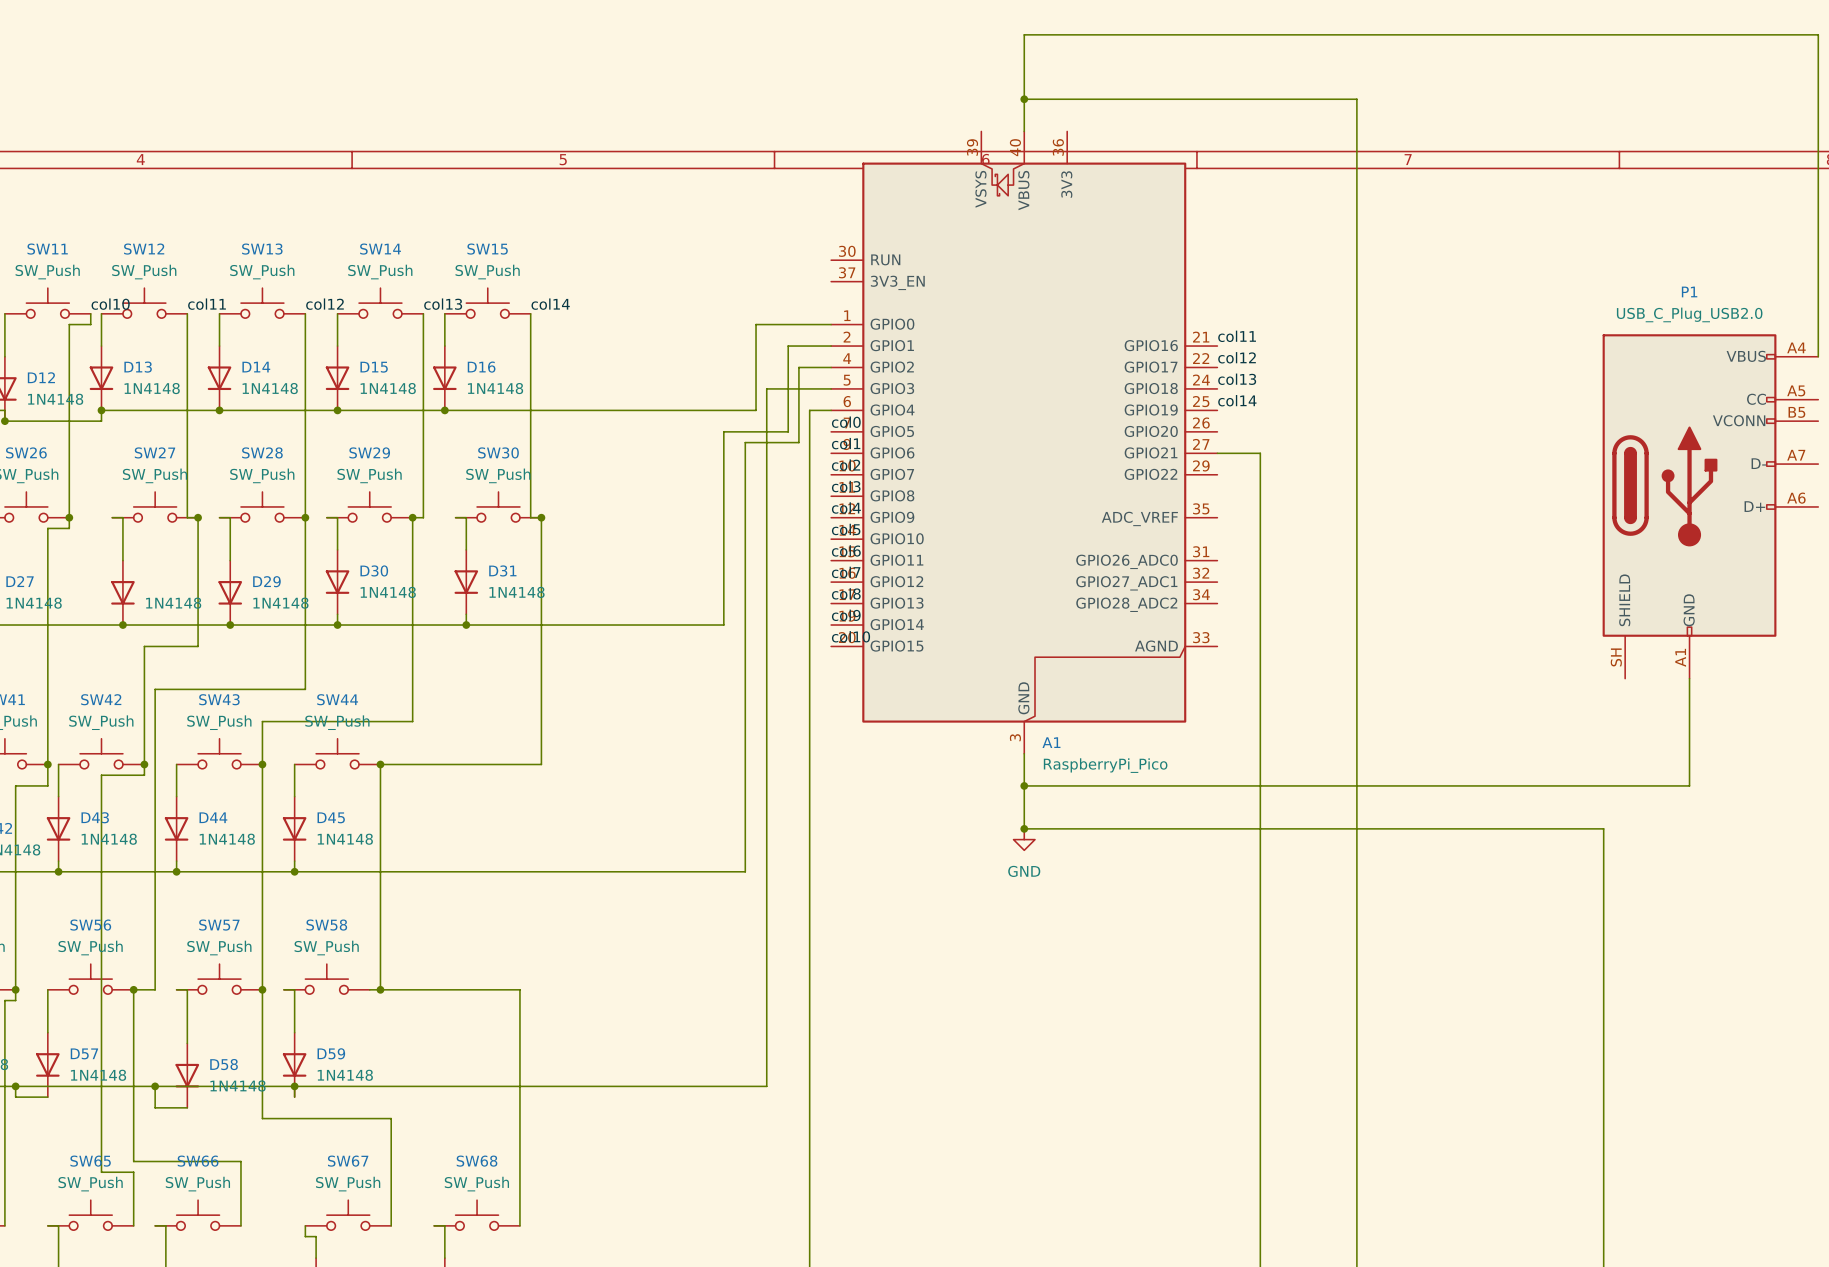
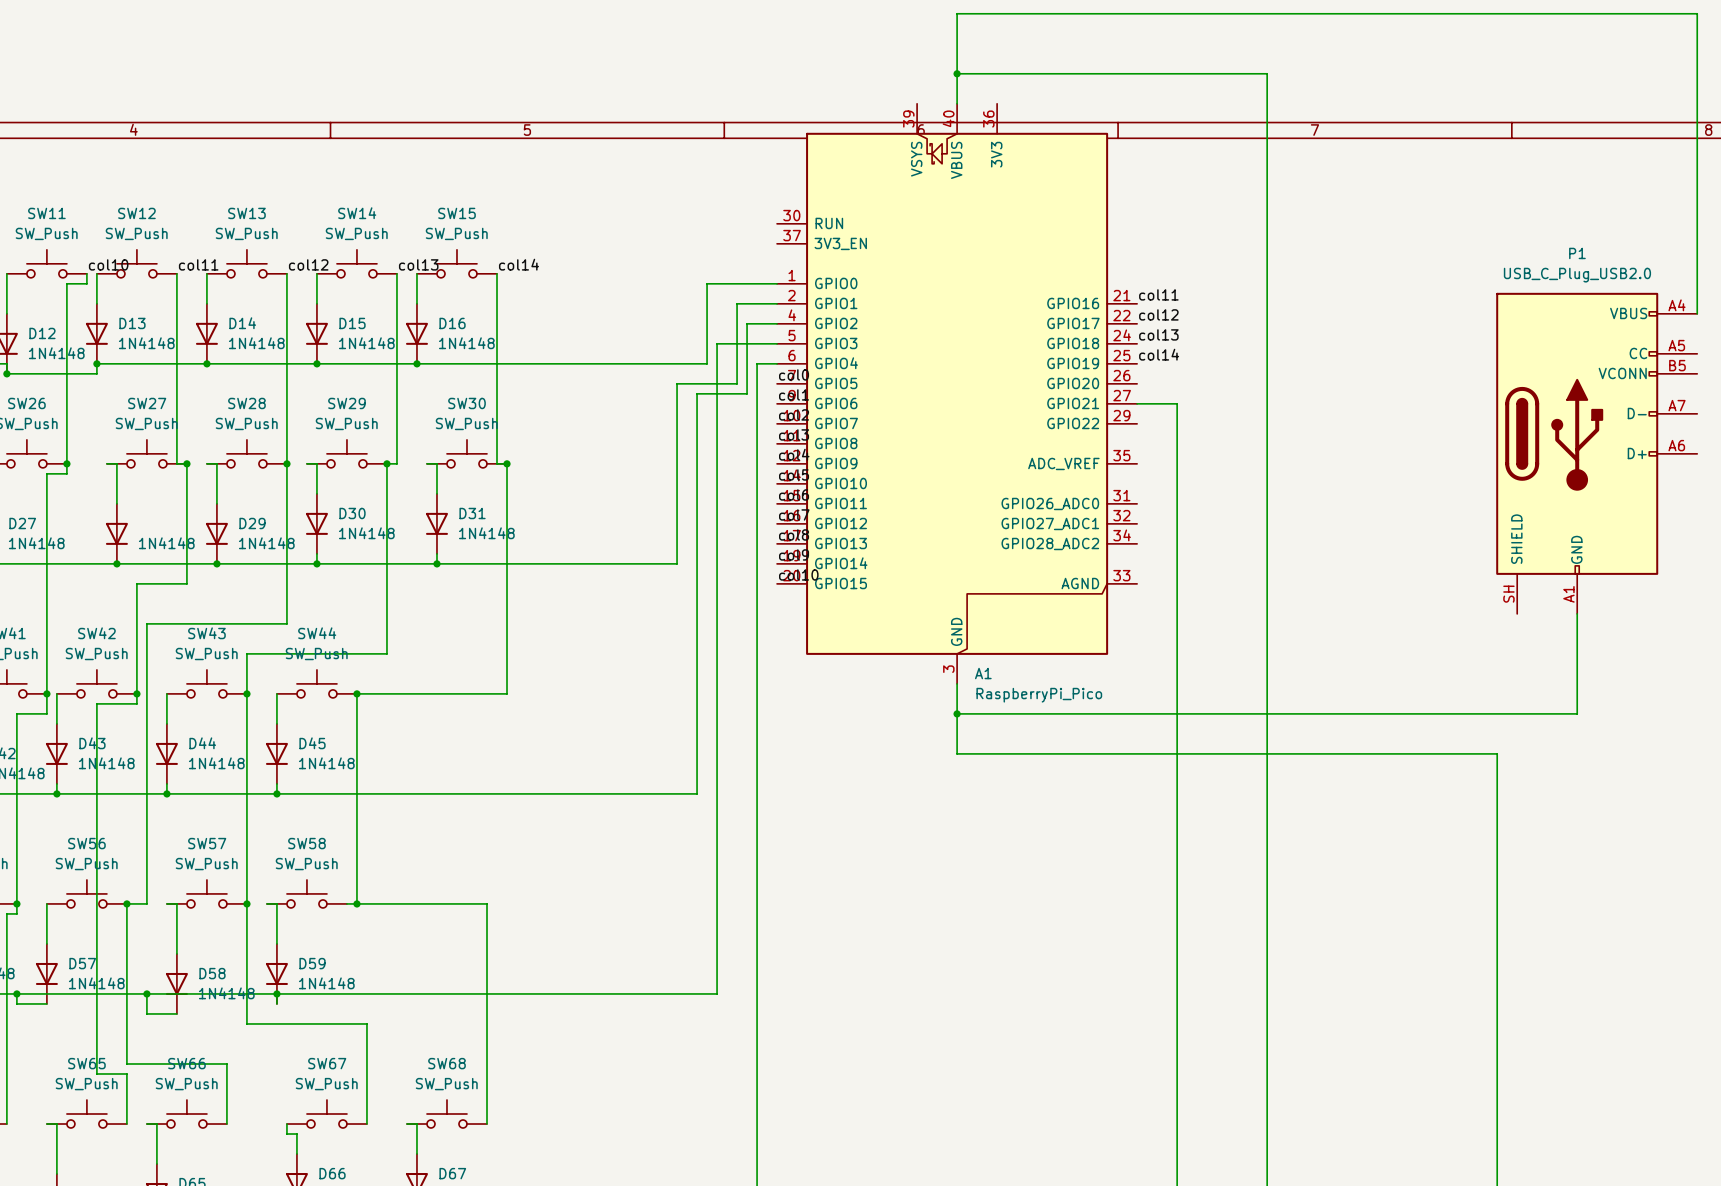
junction: (1024, 828) -> none
power symbol: GND (1024, 839) -> none

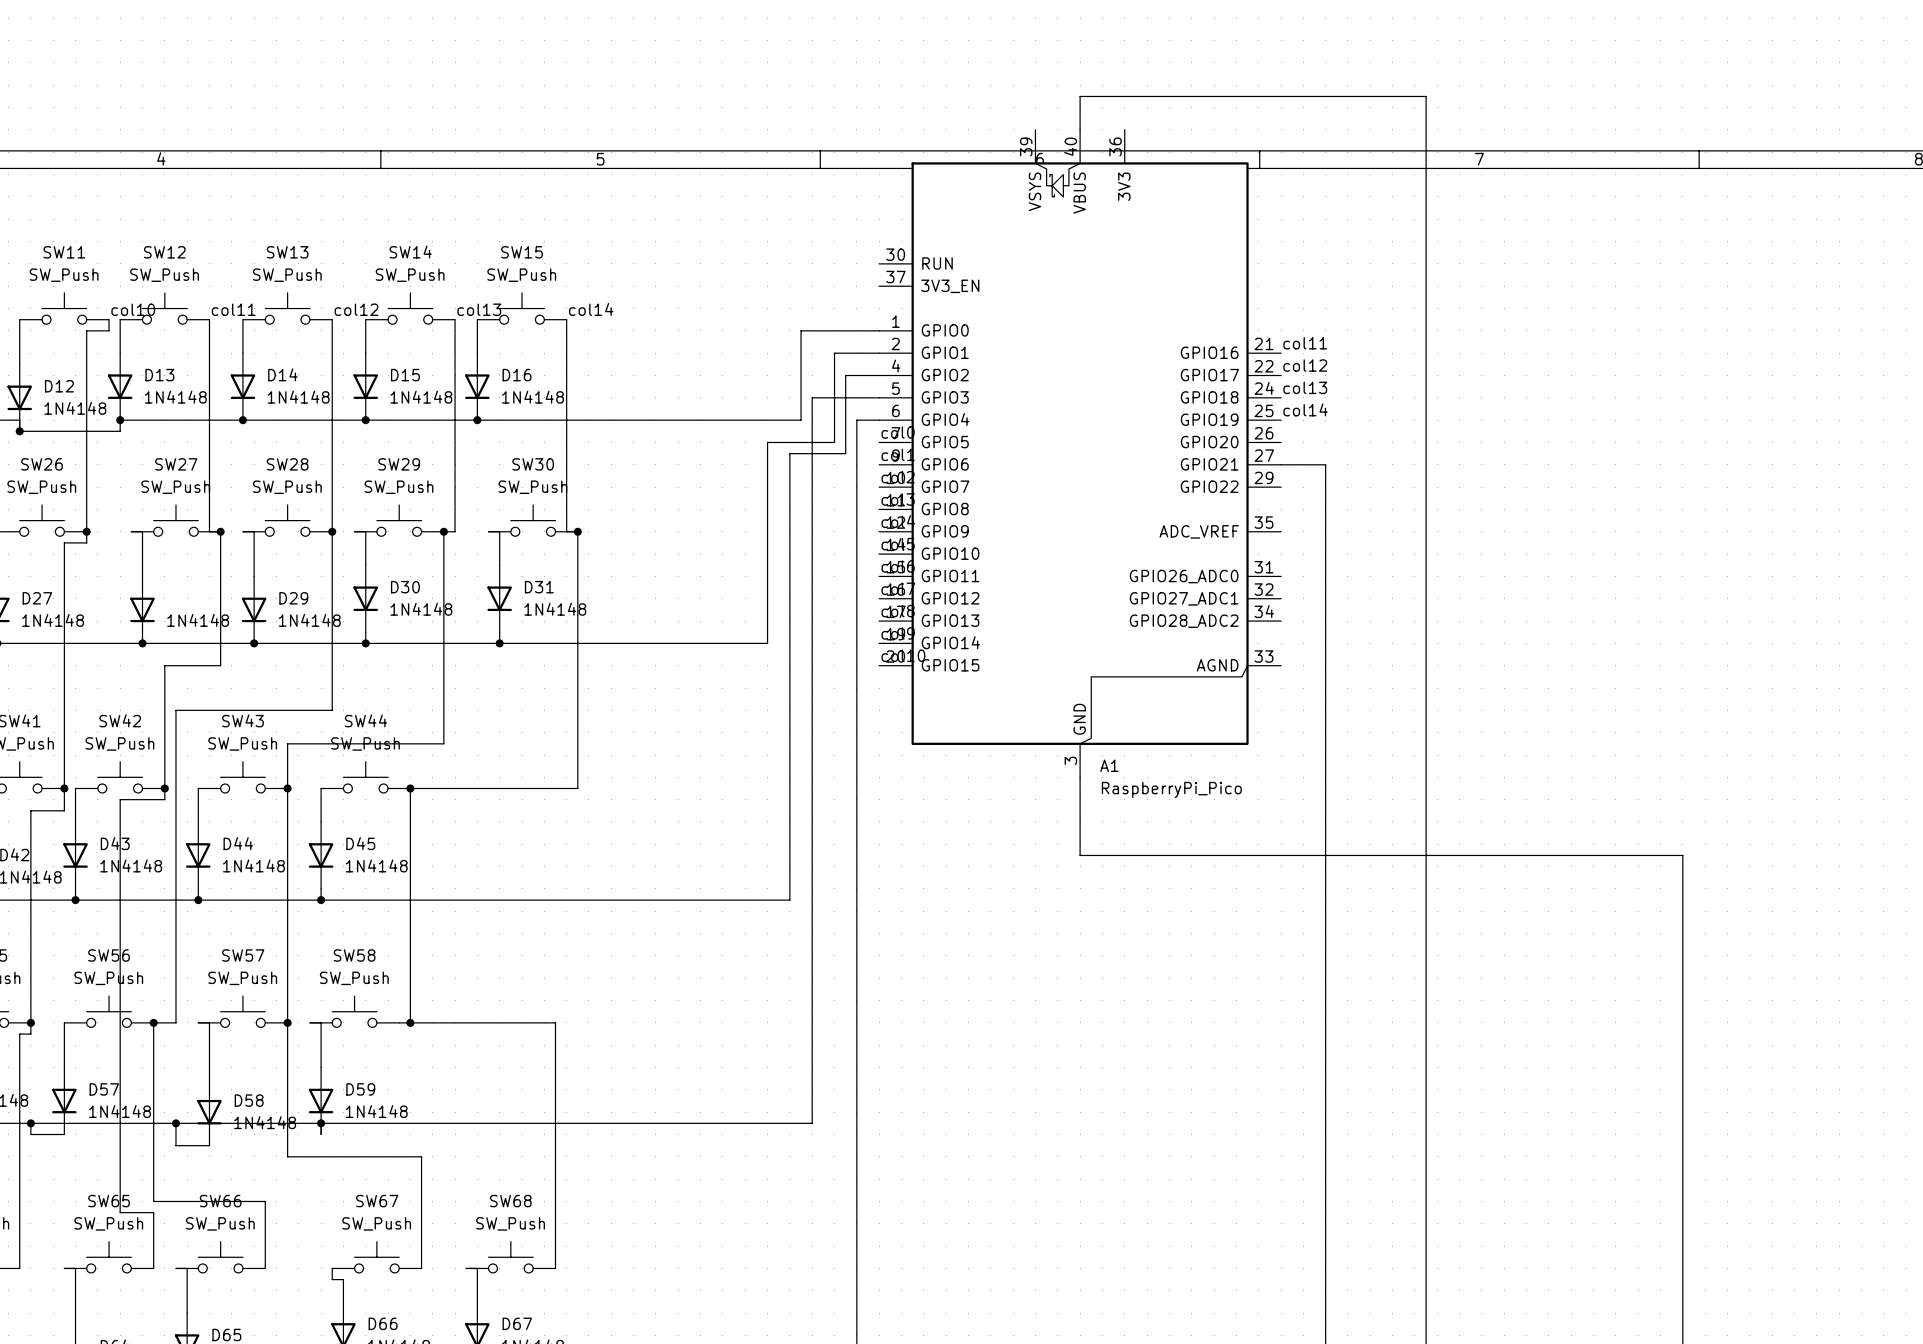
wire: (957, 73) (957, 13) (1697, 13) (1697, 313) -> none
junction: (957, 73) -> none
P1: USB_C_Plug_USB2.0 (1596, 453) -> none
wire: (1577, 613) (1577, 713) (957, 713) -> none
junction: (957, 713) -> none

